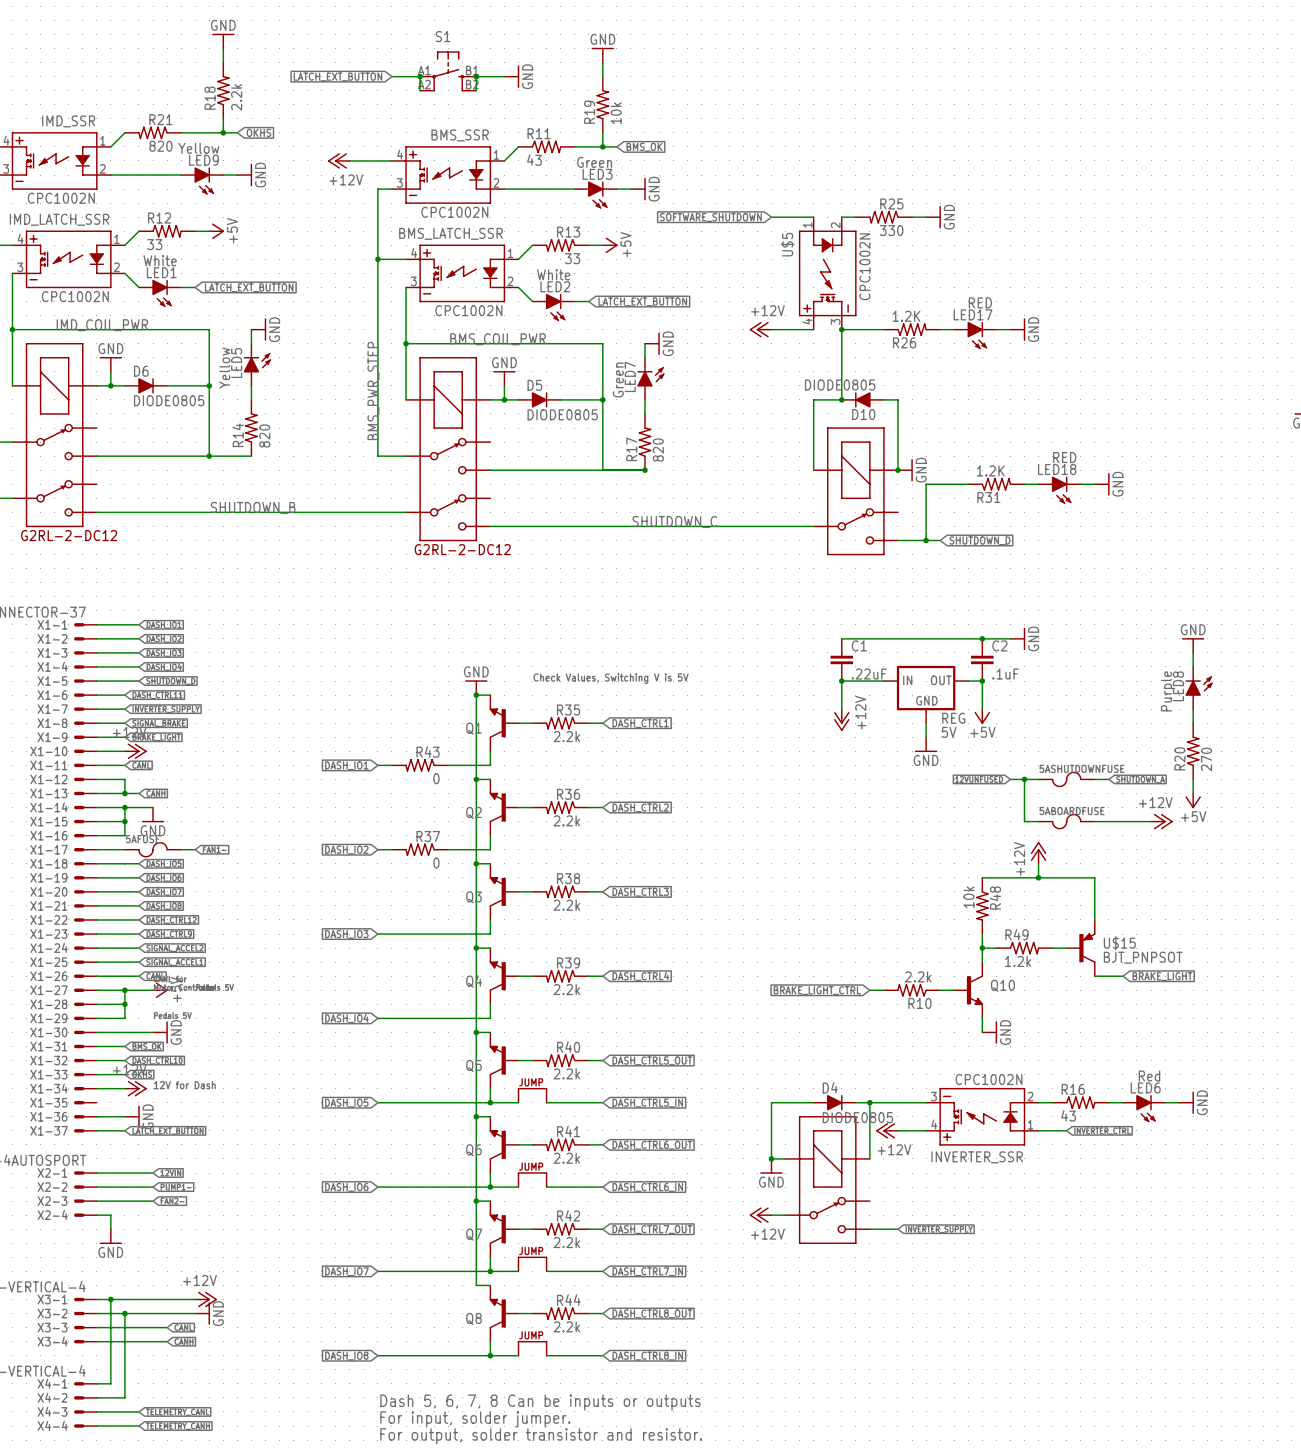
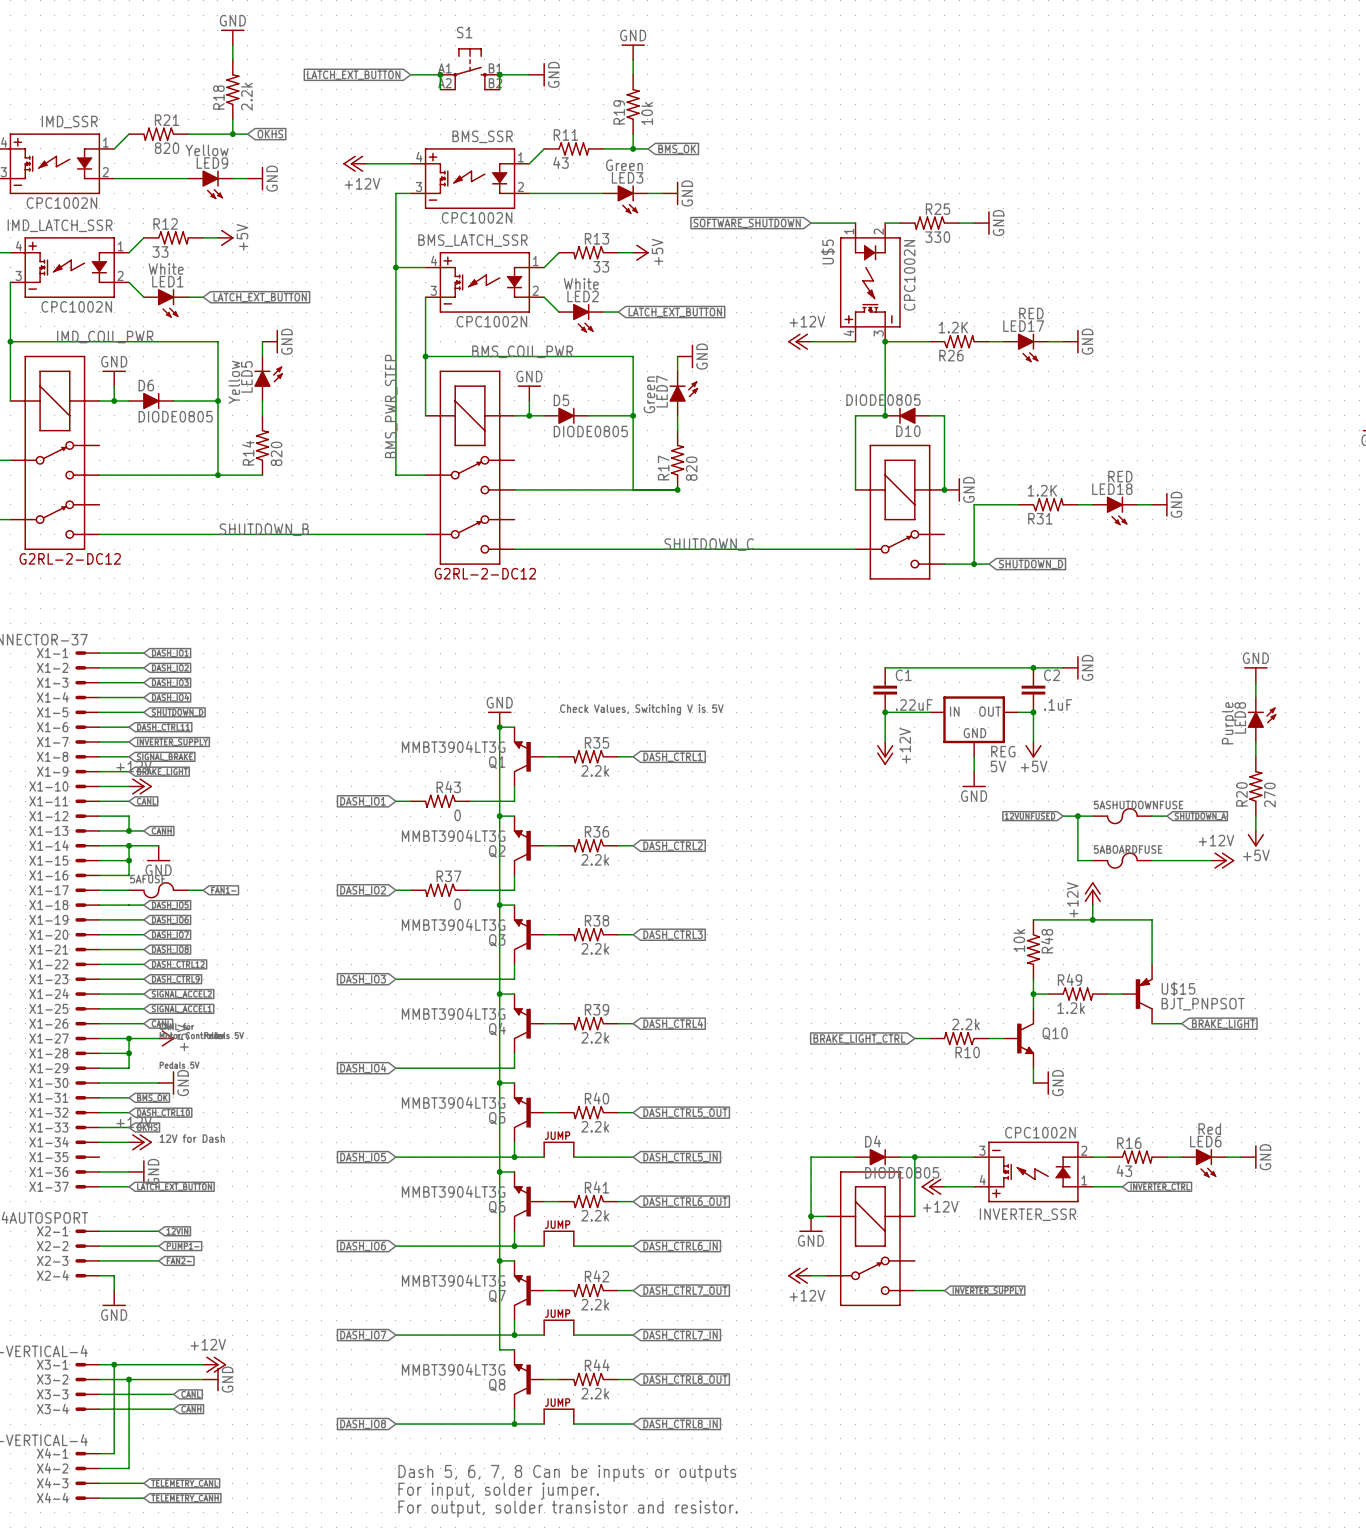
Q1 value: none -> MMBT3904LT3G (453, 746)
Q2 value: none -> MMBT3904LT3G (453, 835)
Q3 value: none -> MMBT3904LT3G (453, 924)
Q4 value: none -> MMBT3904LT3G (453, 1013)
Q5 value: none -> MMBT3904LT3G (453, 1102)
Q6 value: none -> MMBT3904LT3G (453, 1191)
Q7 value: none -> MMBT3904LT3G (453, 1280)
Q8 value: none -> MMBT3904LT3G (453, 1369)

